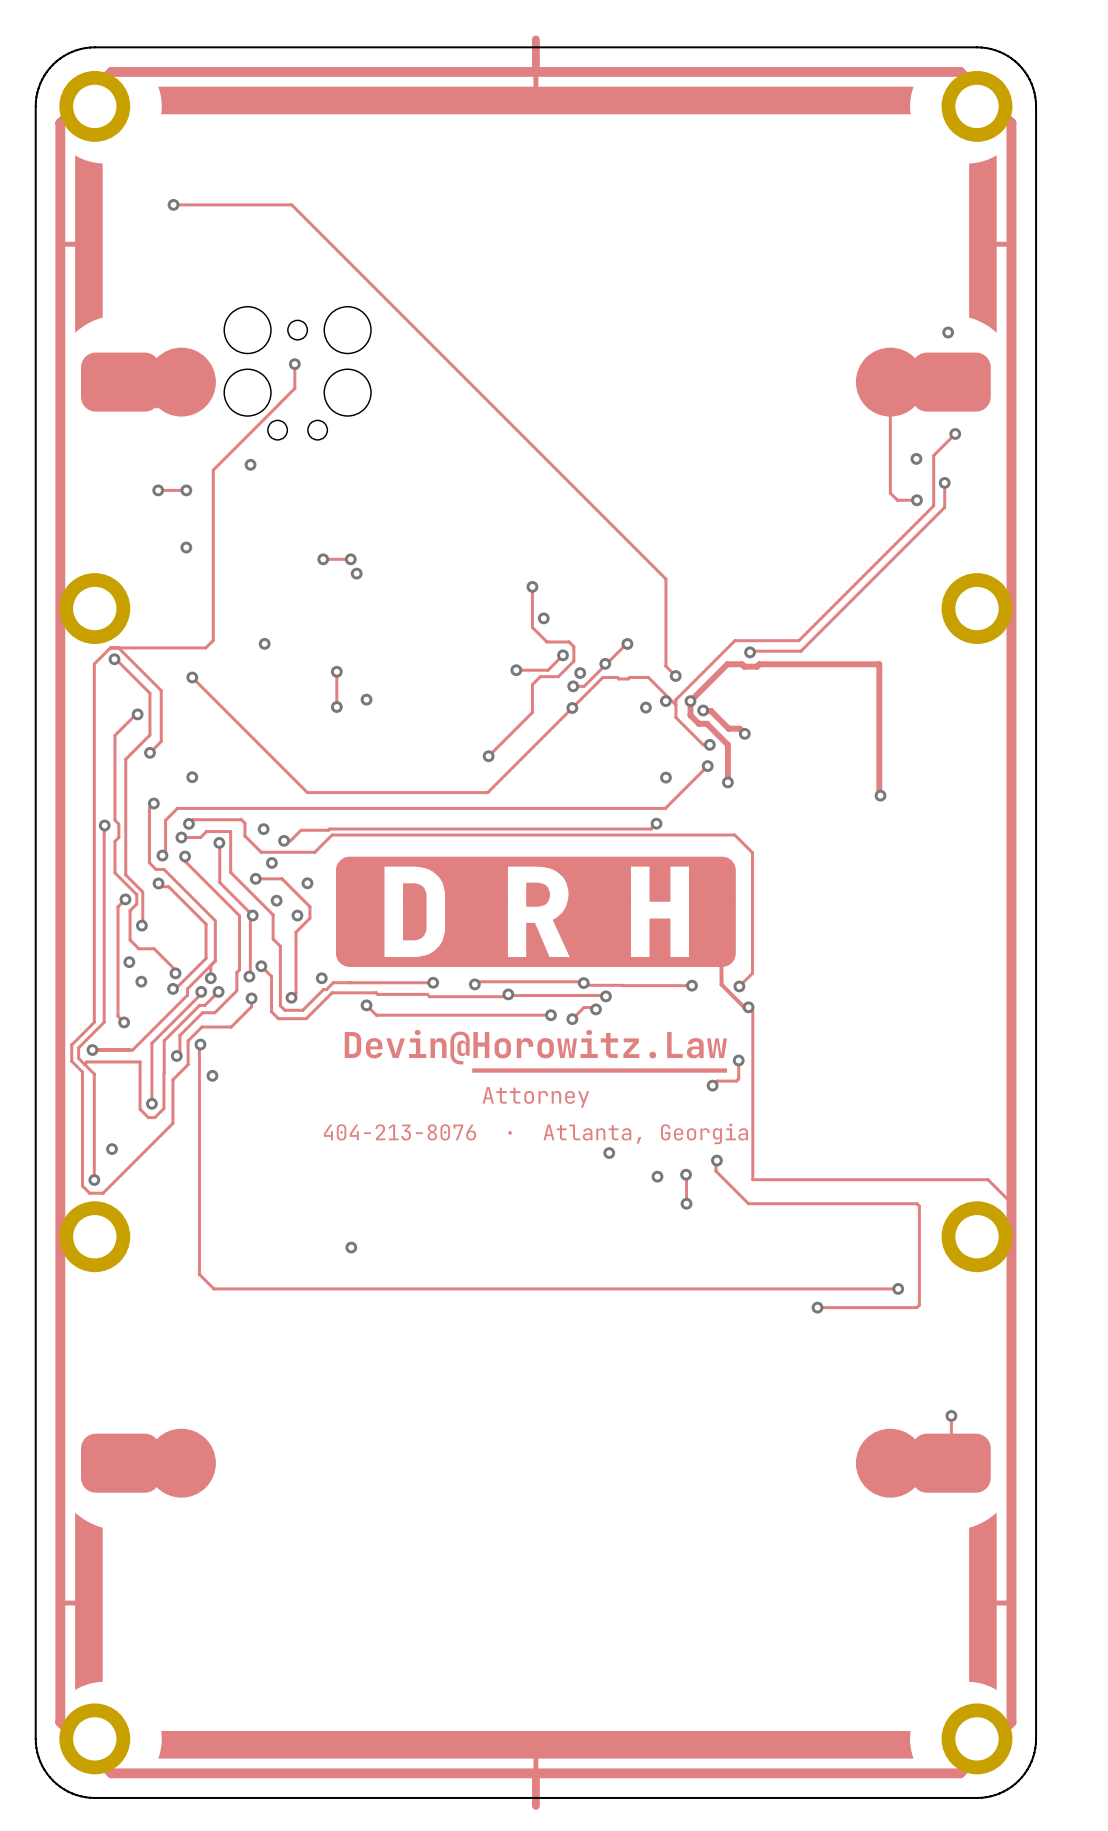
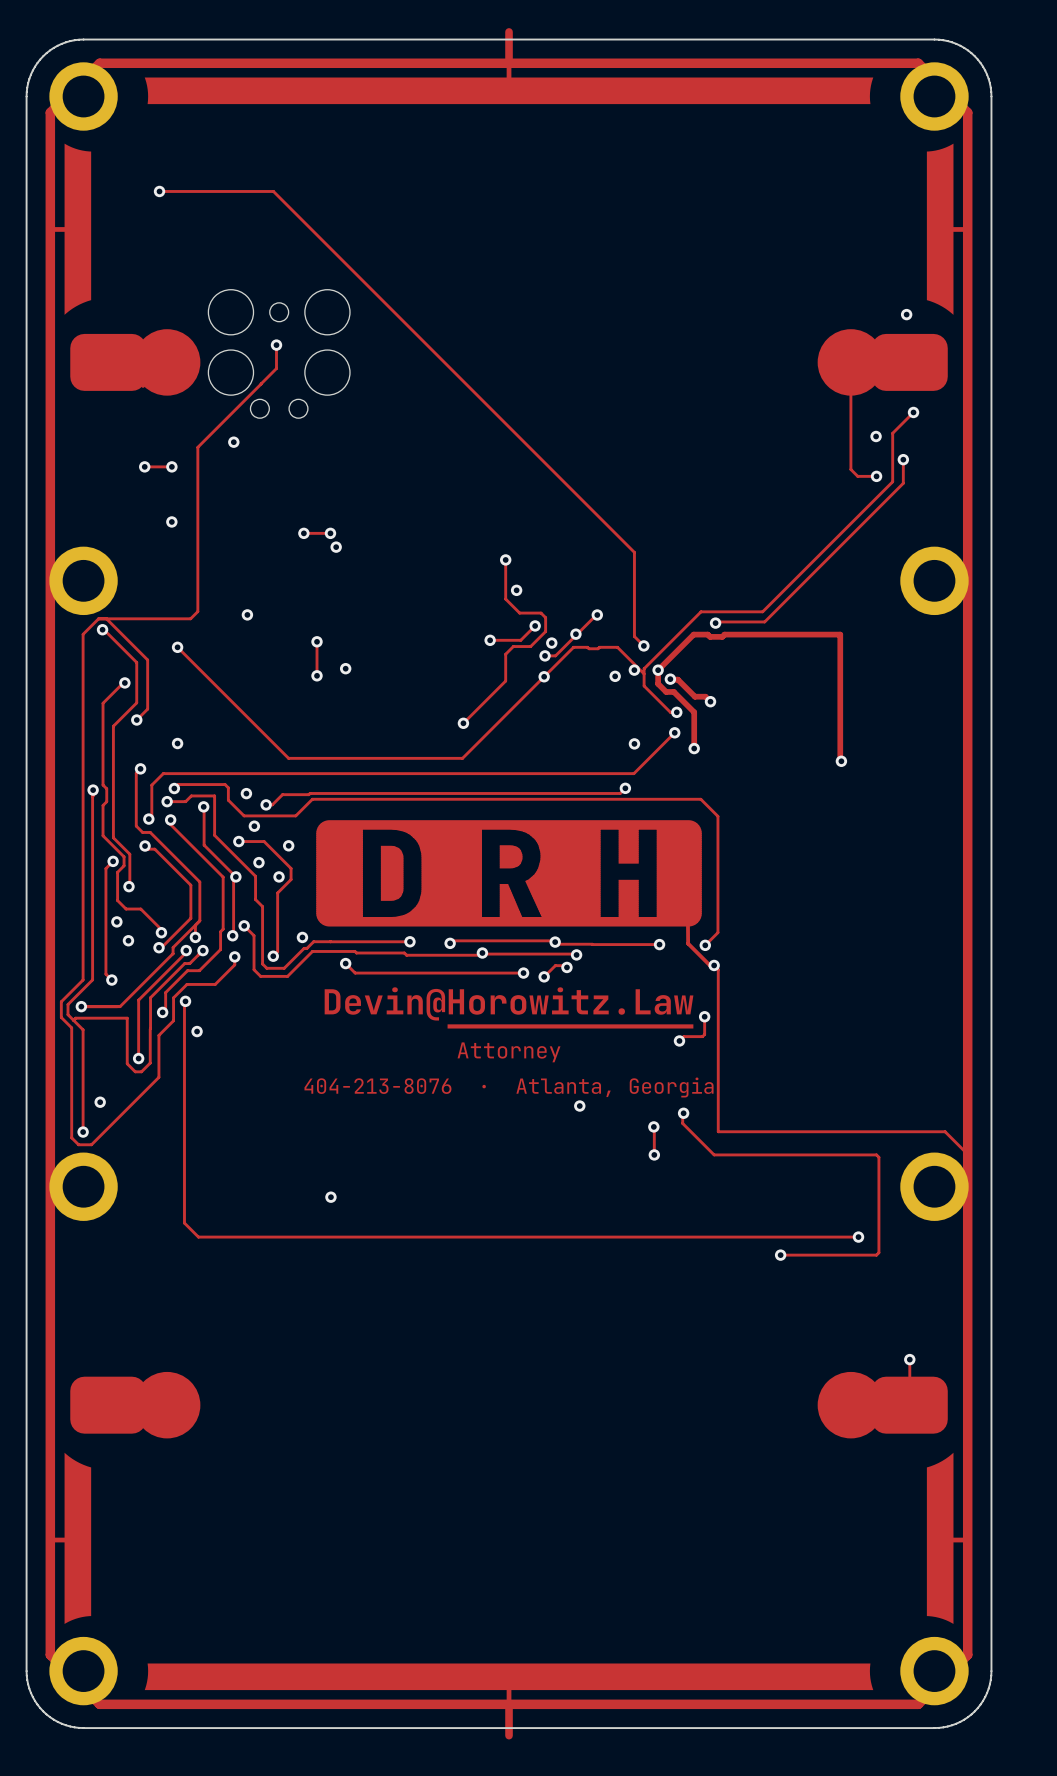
via: (657, 1176) -> none

